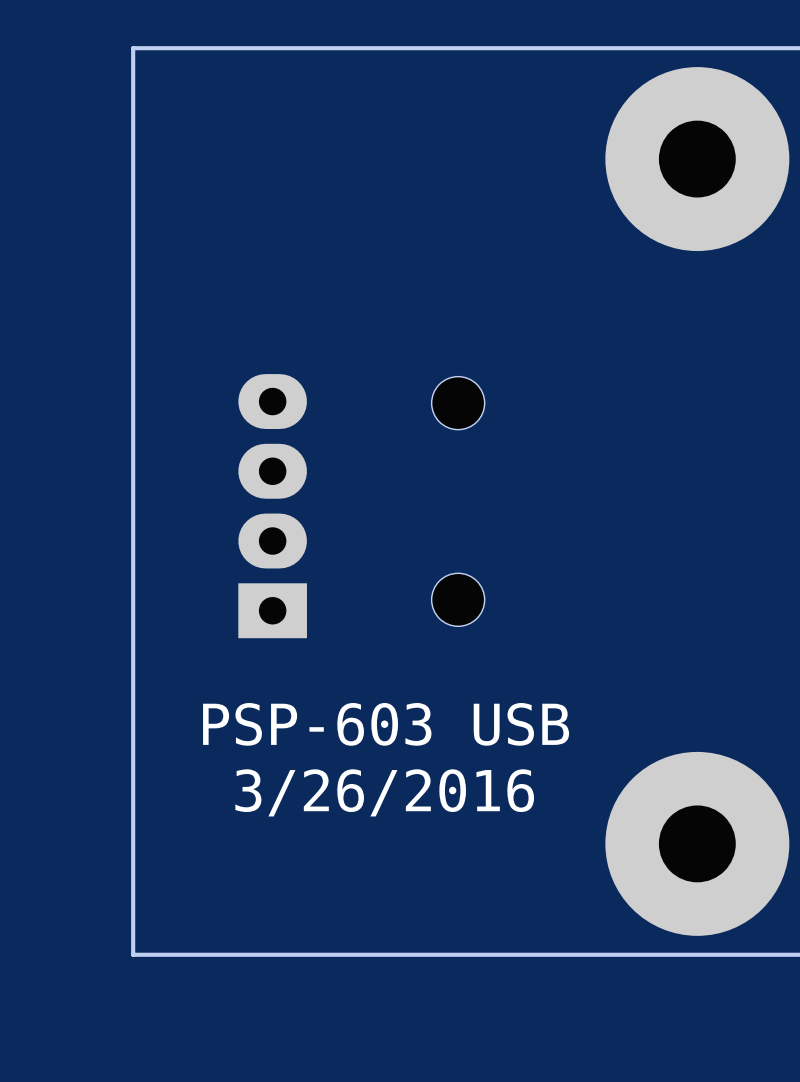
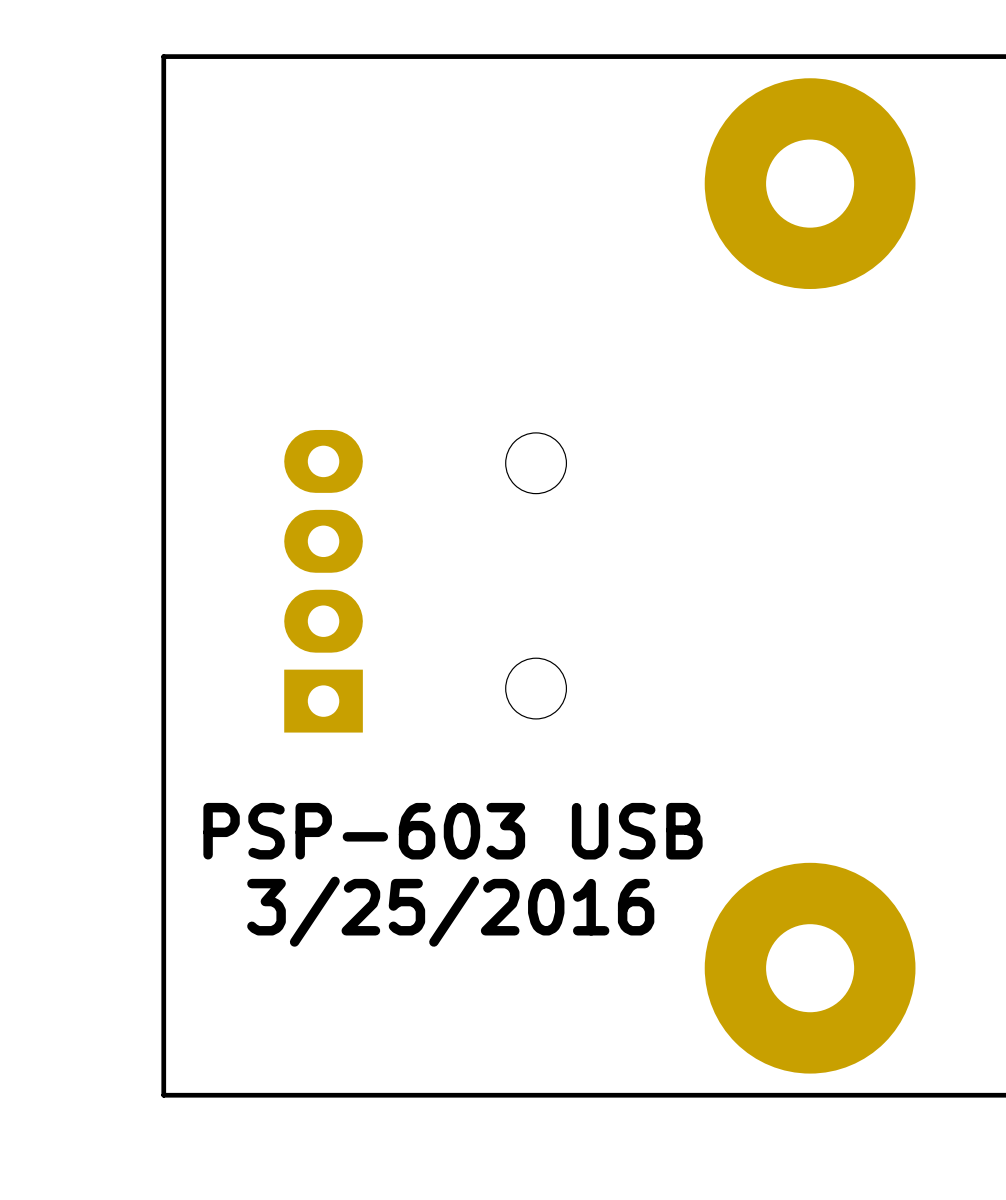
text: 3/26/2016 (384, 792) -> 3/25/2016 (450, 911)

